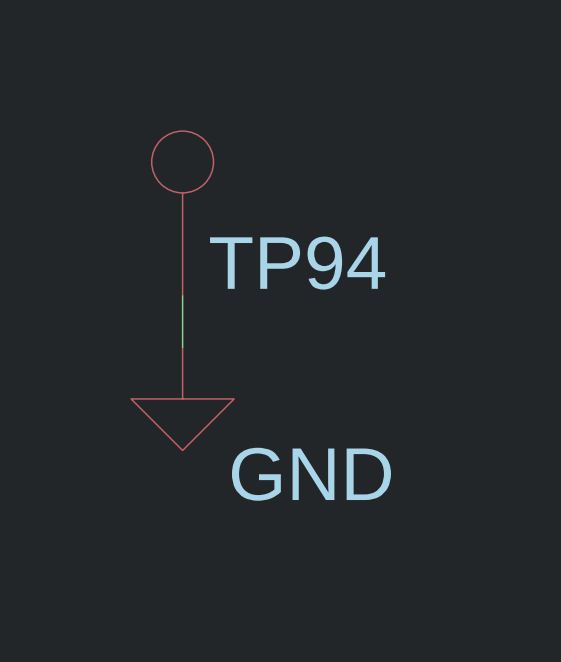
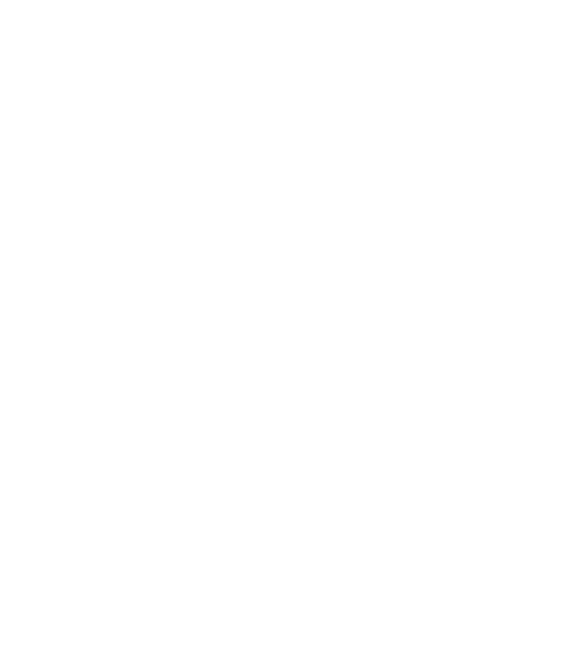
TP94: (182, 213) -> none
wire: (182, 295) (182, 347) -> none
power symbol: GND (182, 398) -> none

